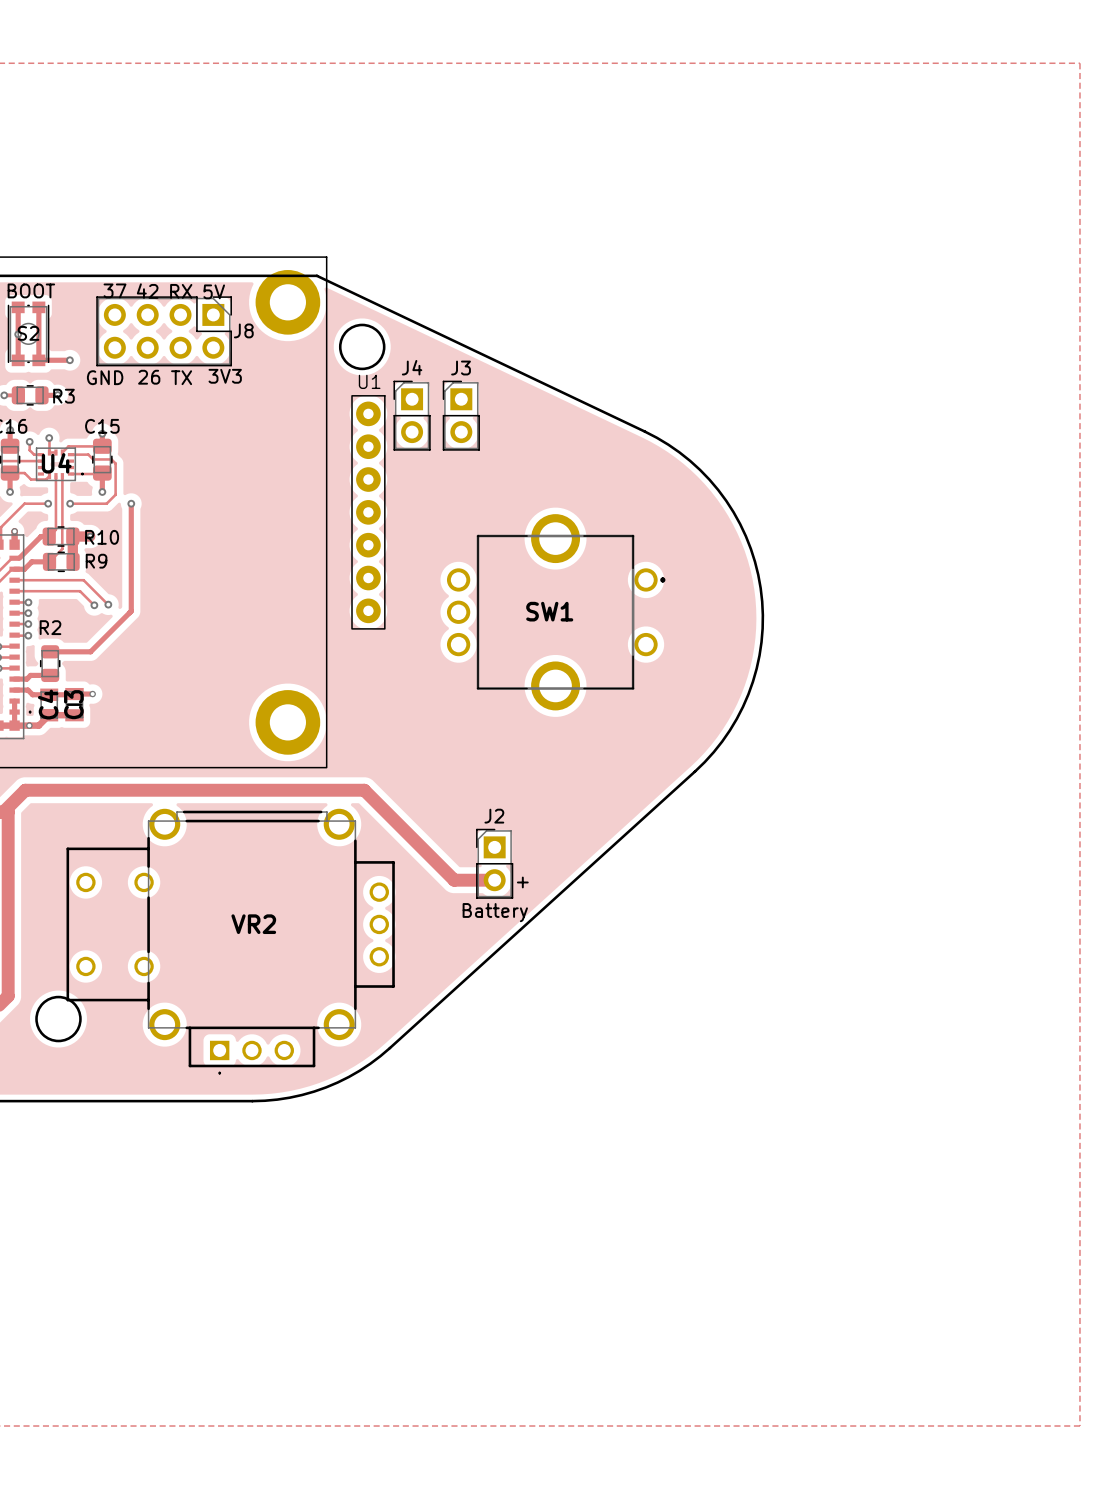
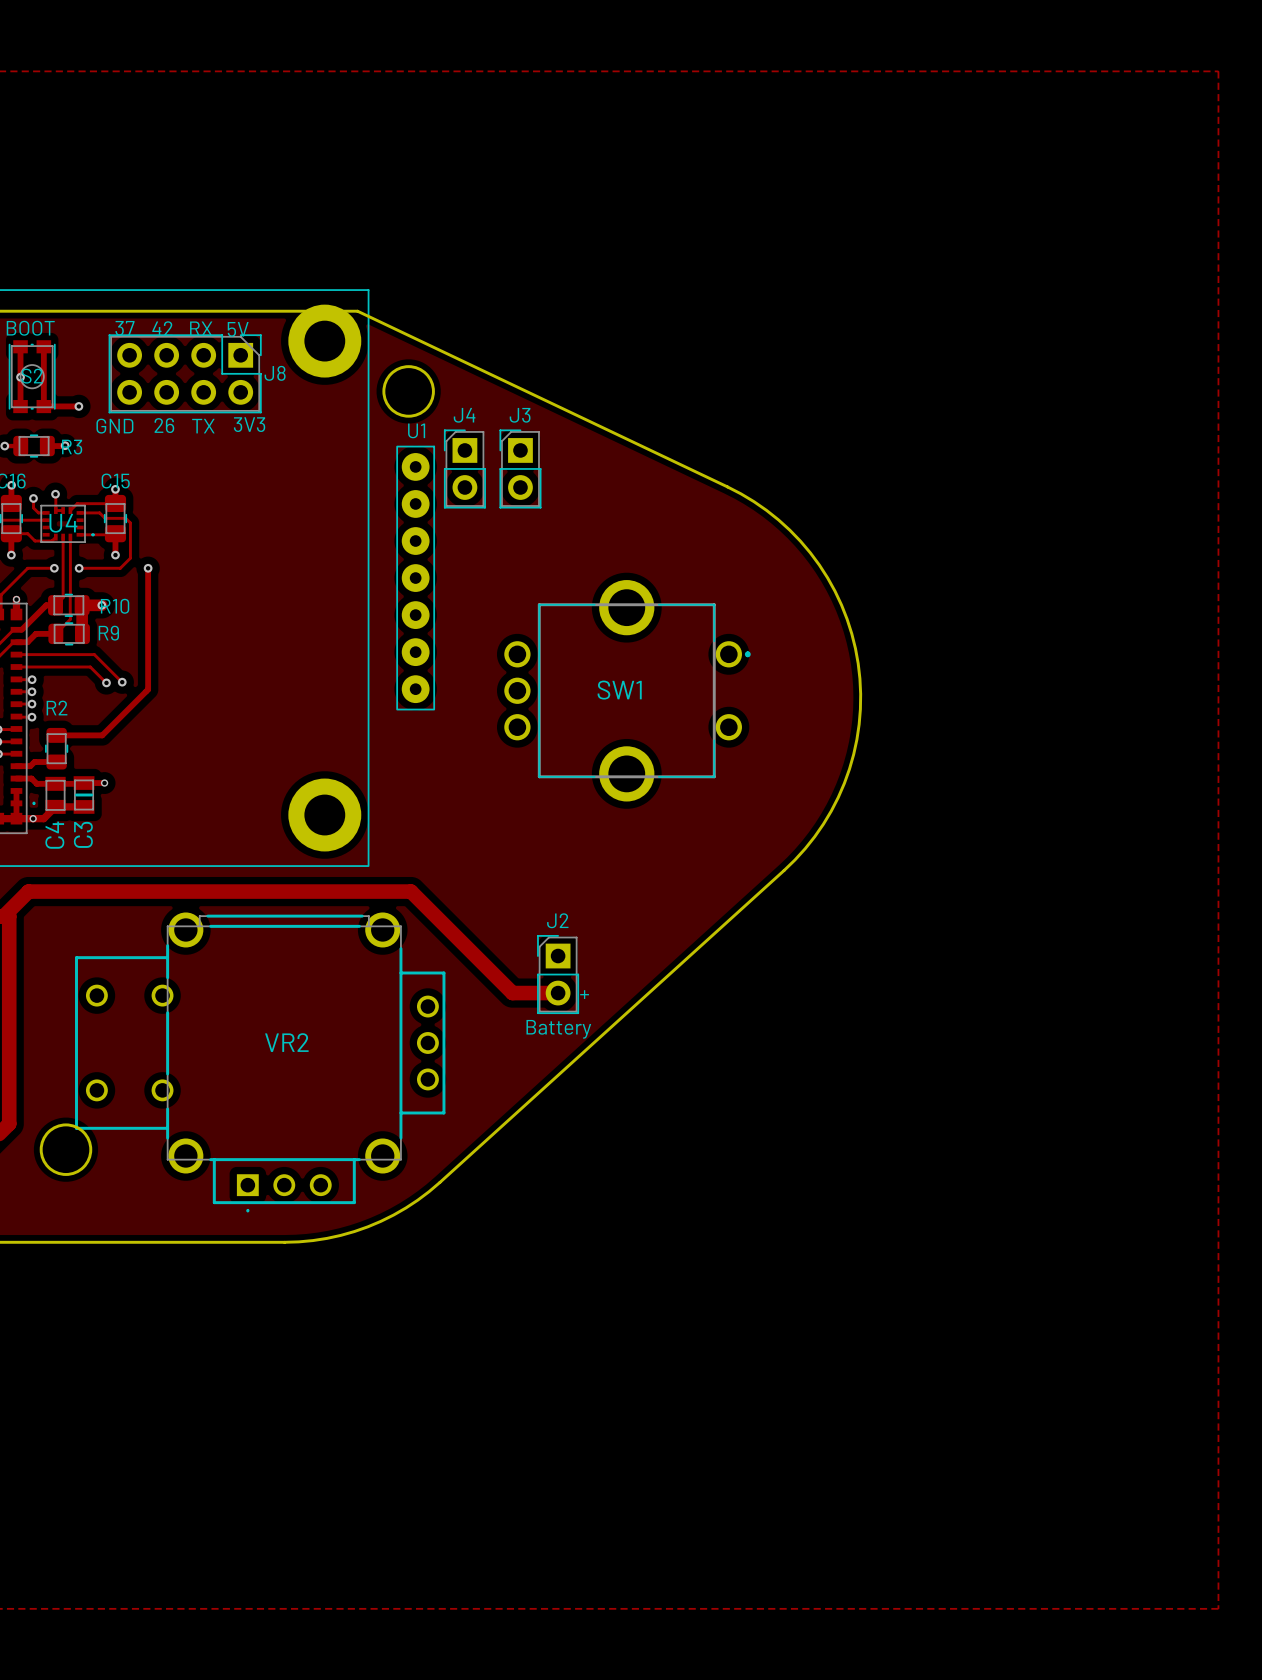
C4 name position: C4 (48, 704) -> C4 (54, 835)
C3 name position: C3 (73, 704) -> C3 (83, 834)

